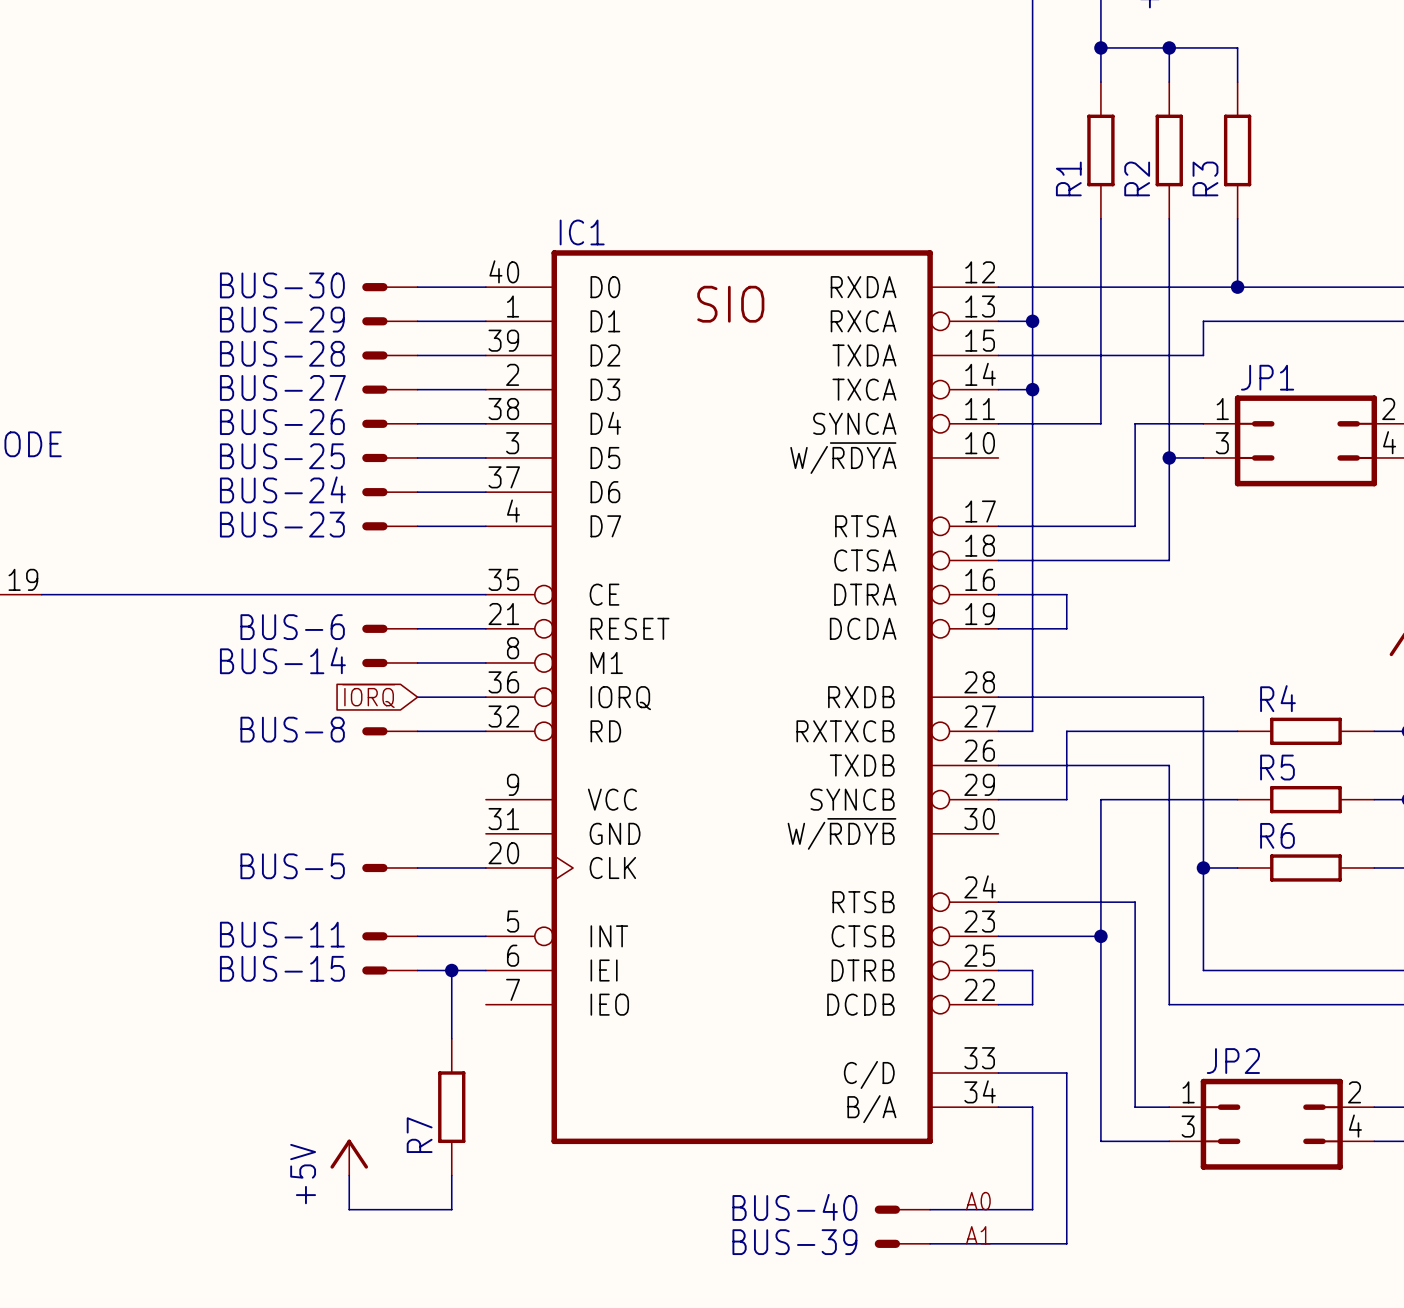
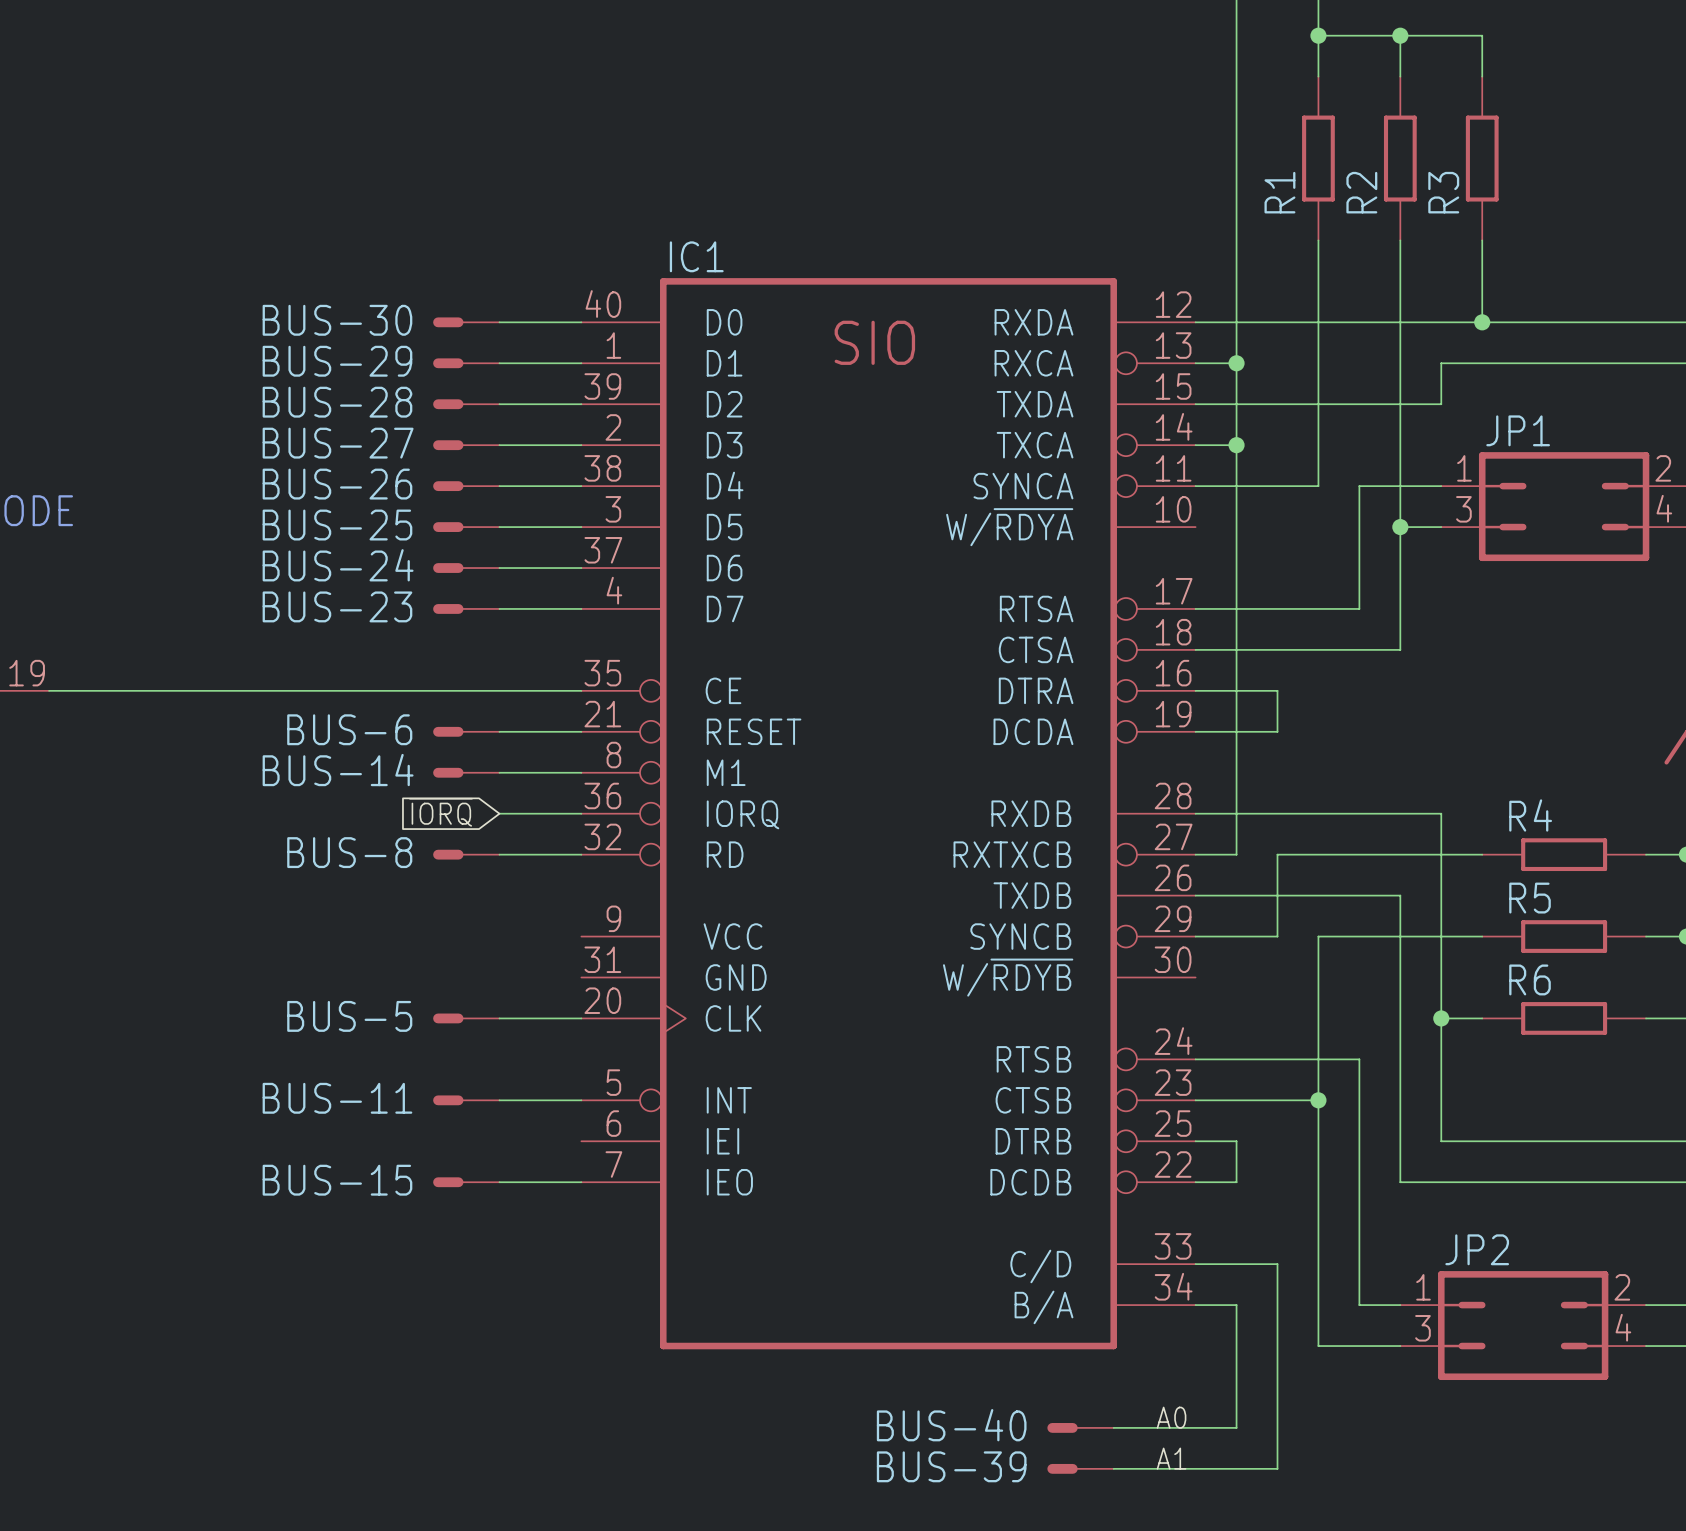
BUS-15 position: (389, 970) -> (466, 1182)
wire: (417, 970) (485, 970) -> (499, 1182) (581, 1182)
wire: (451, 970) (451, 1038) -> none
junction: (451, 970) -> none
R7: (451, 1107) -> none
power symbol: +5V (349, 1157) -> none
wire: (349, 1175) (349, 1209) (451, 1209) (451, 1175) -> none

